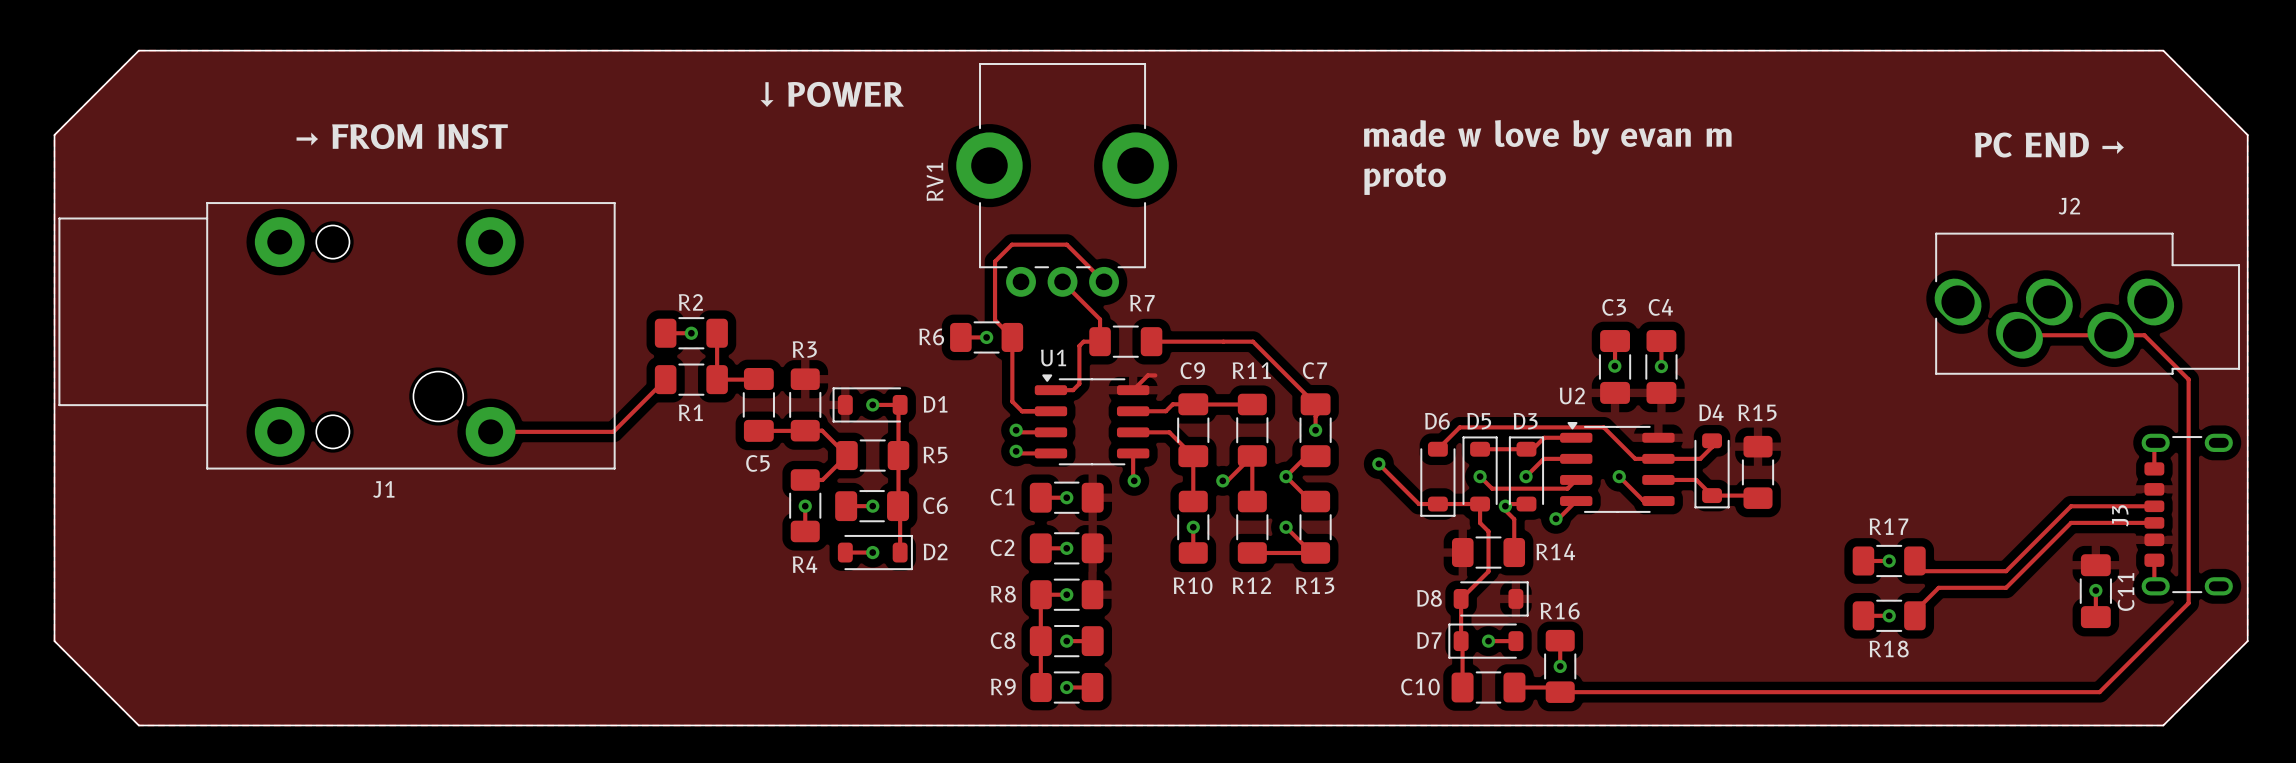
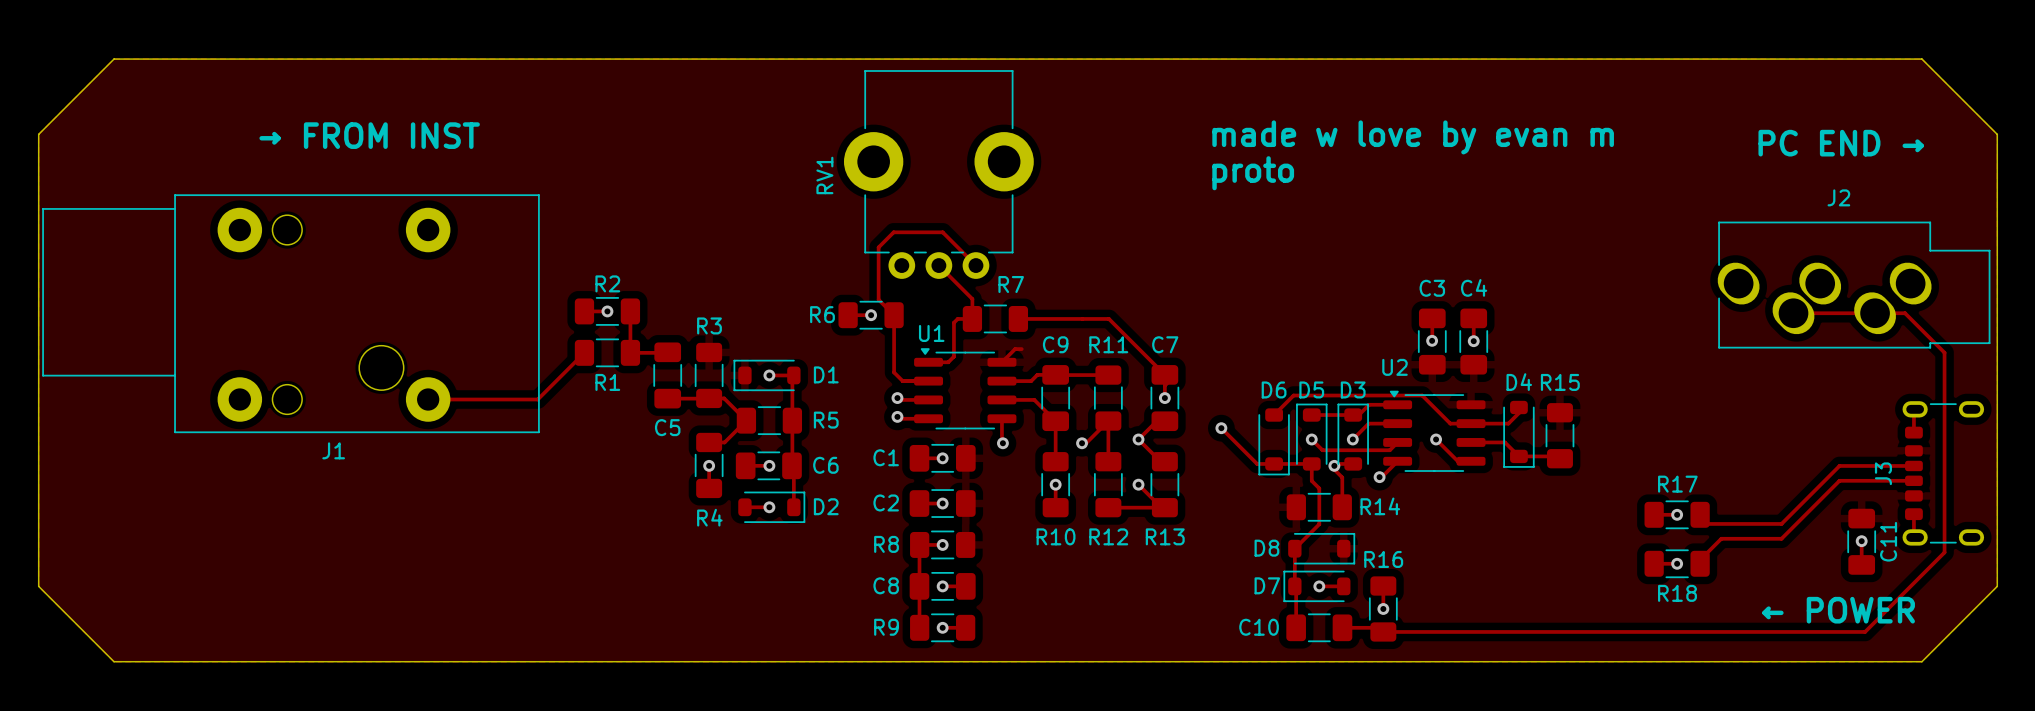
text: ↓ POWER (832, 94) -> none
text: none -> ← POWER (1838, 610)

